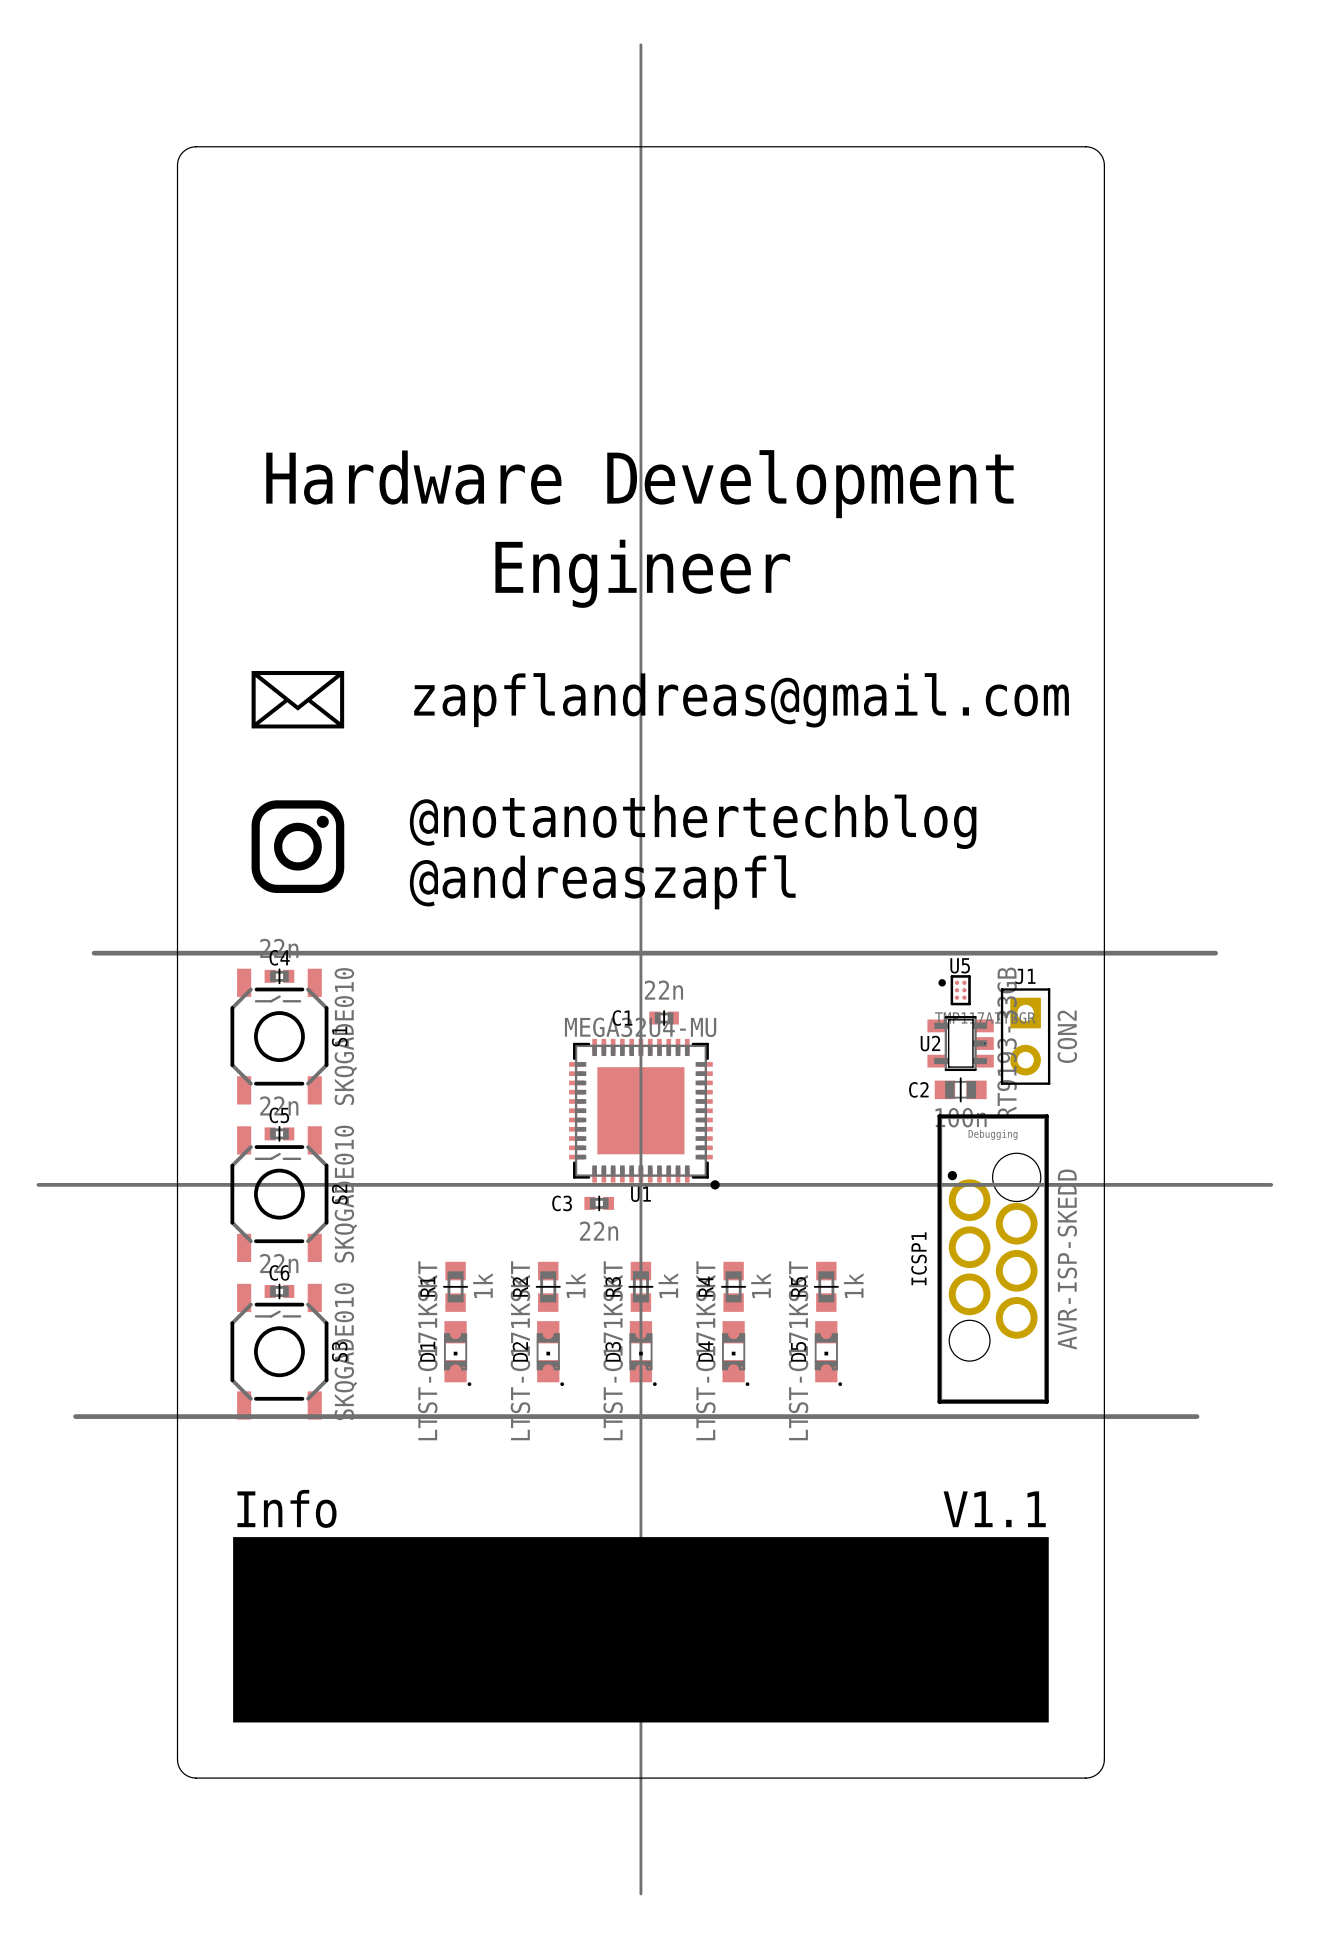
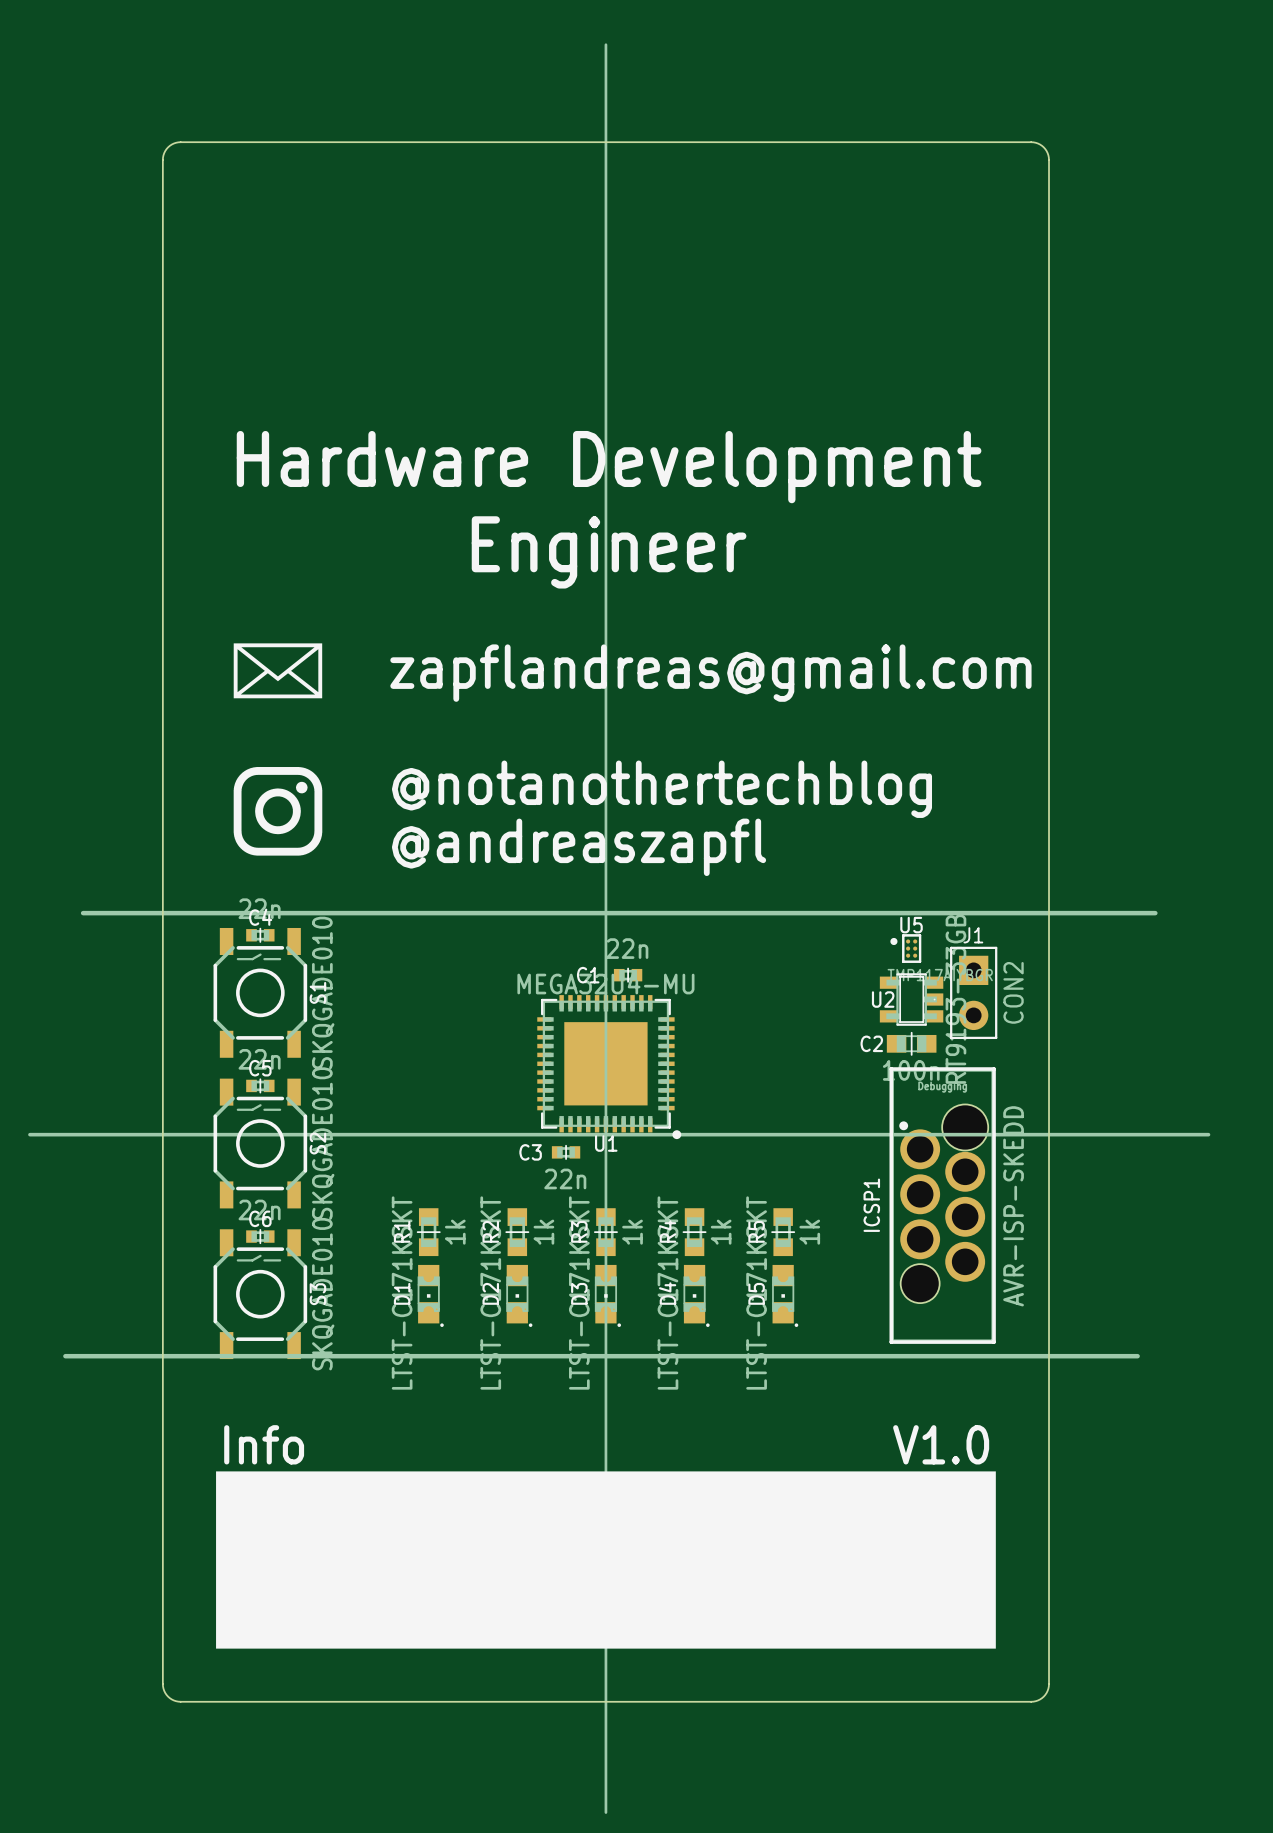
text: V1.1 (994, 1509) -> V1.0 (941, 1444)

